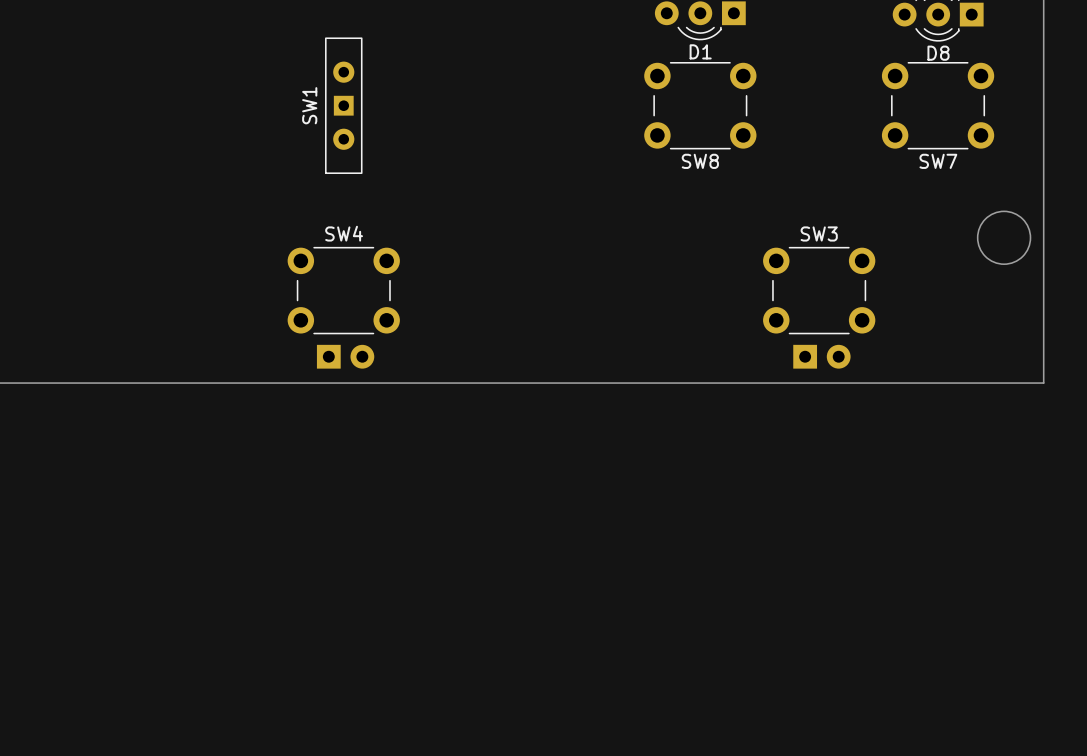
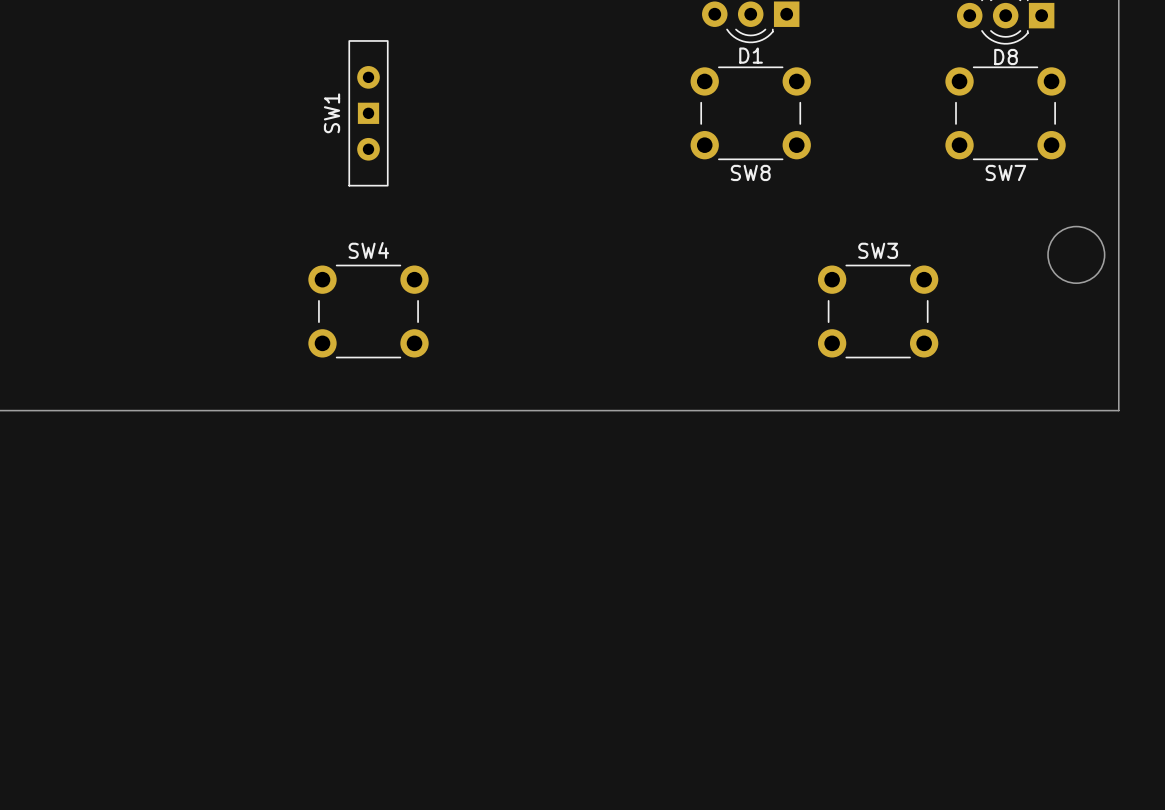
part: (345, 356) -> none
part: (821, 356) -> none

